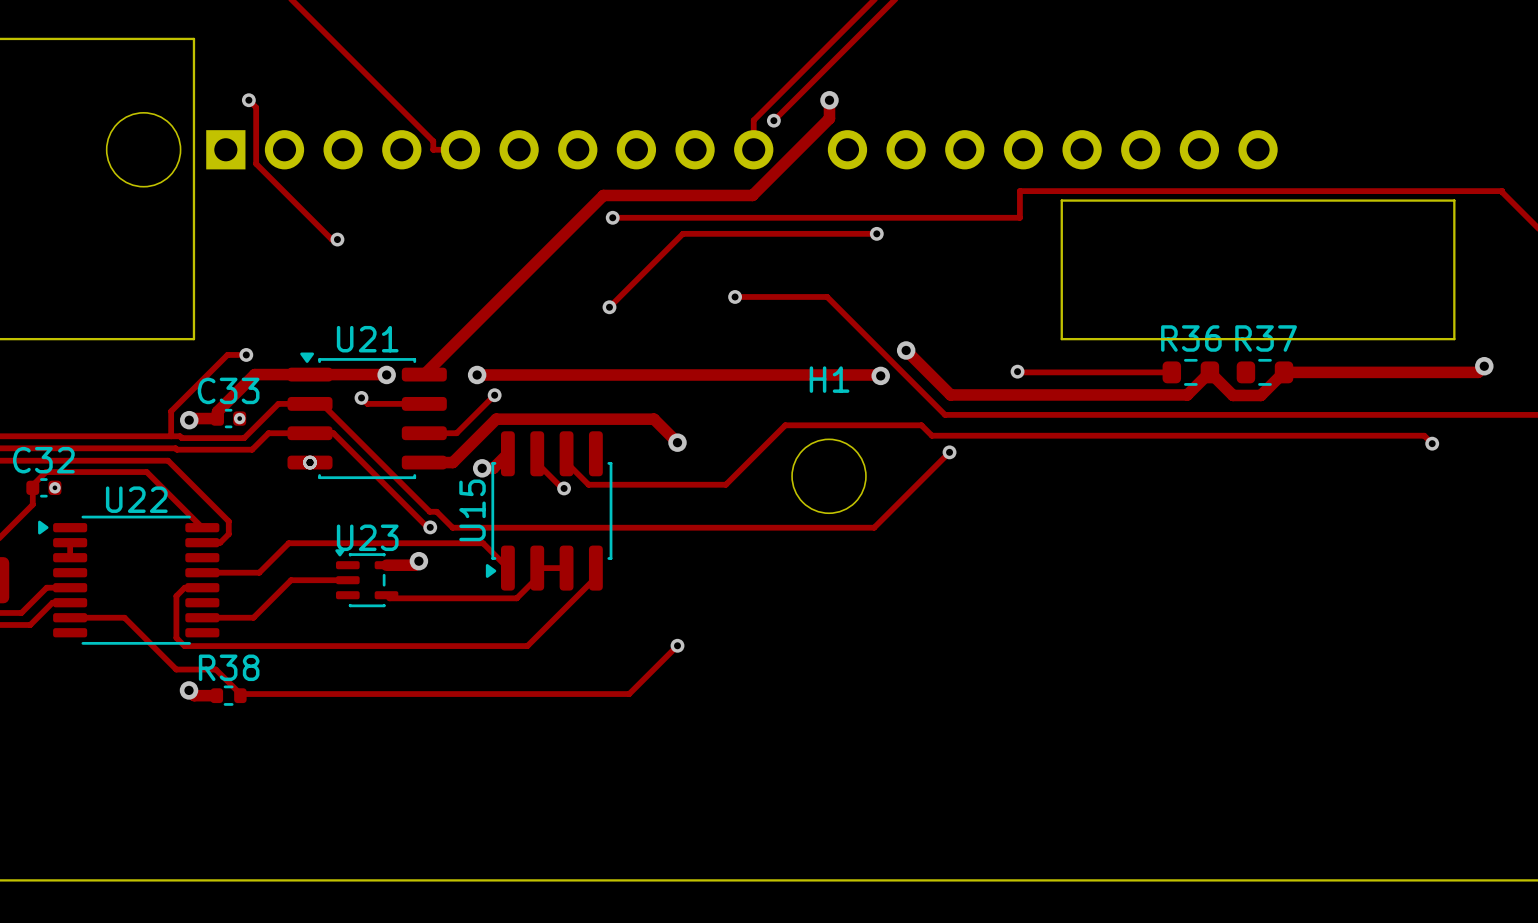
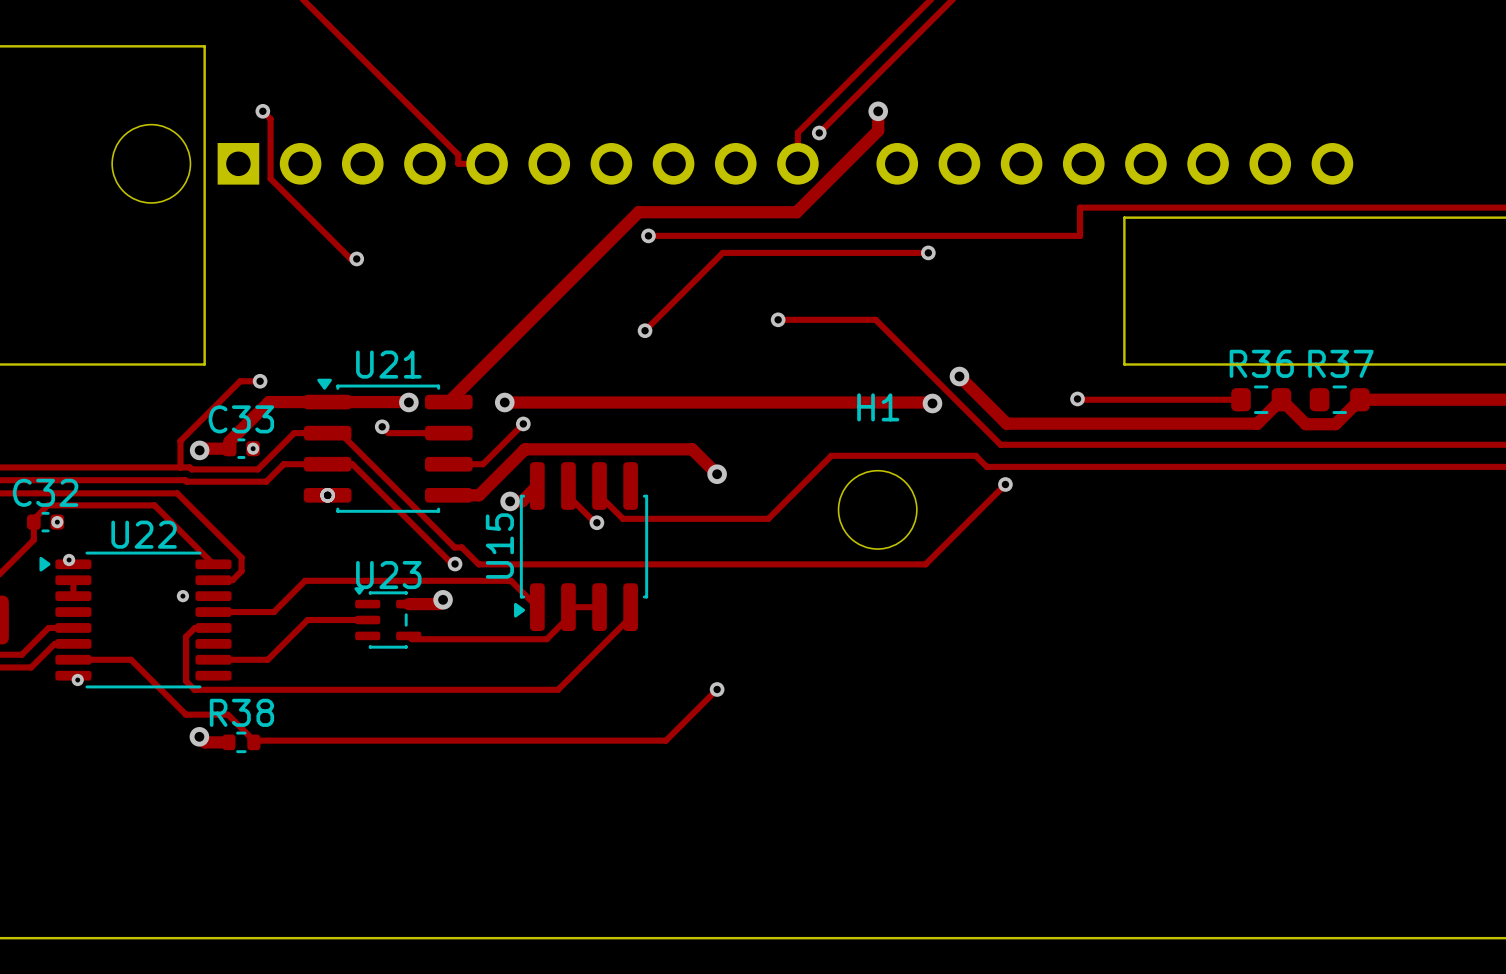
via: none -> (69, 560)
via: none -> (182, 596)
via: none -> (77, 680)

